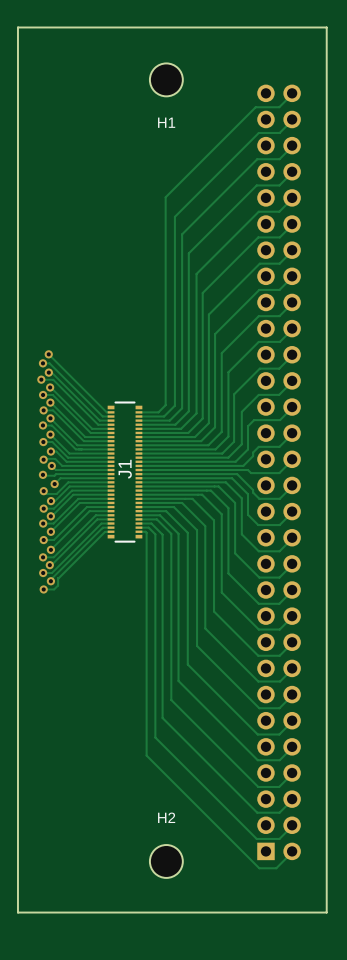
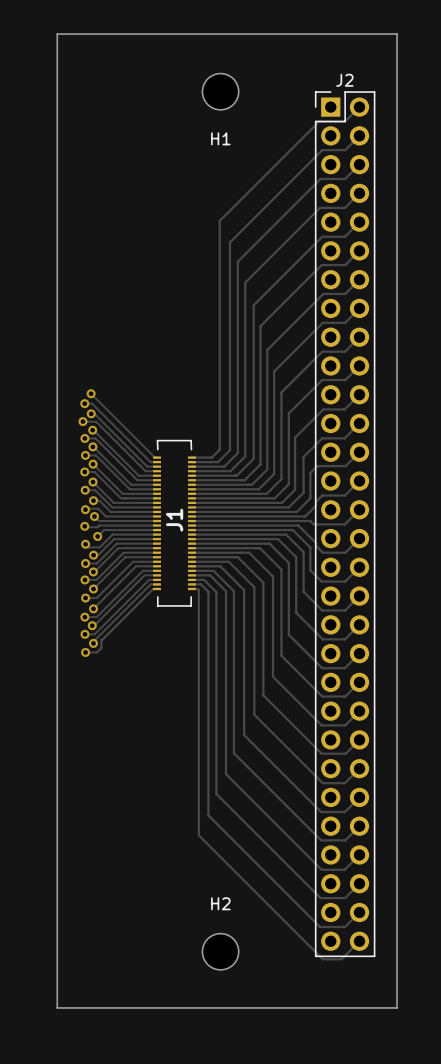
J1 footprint: [107, 401, 143, 543] -> [153, 440, 196, 607]
J2 side: bottom (279, 472) -> top (345, 524)

